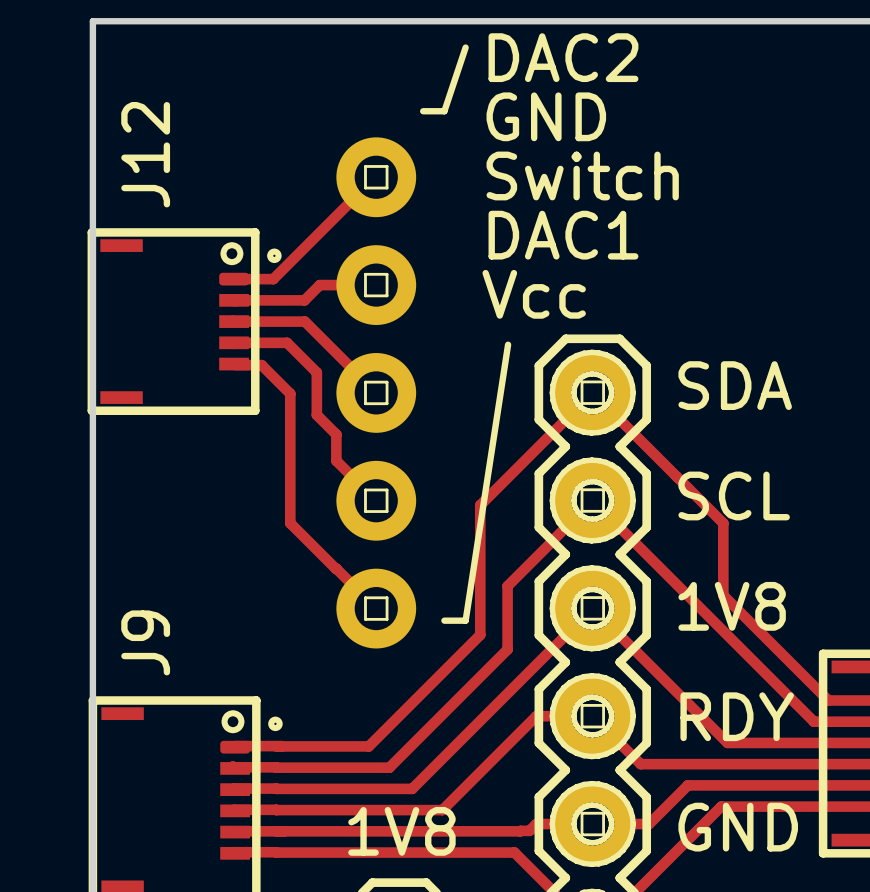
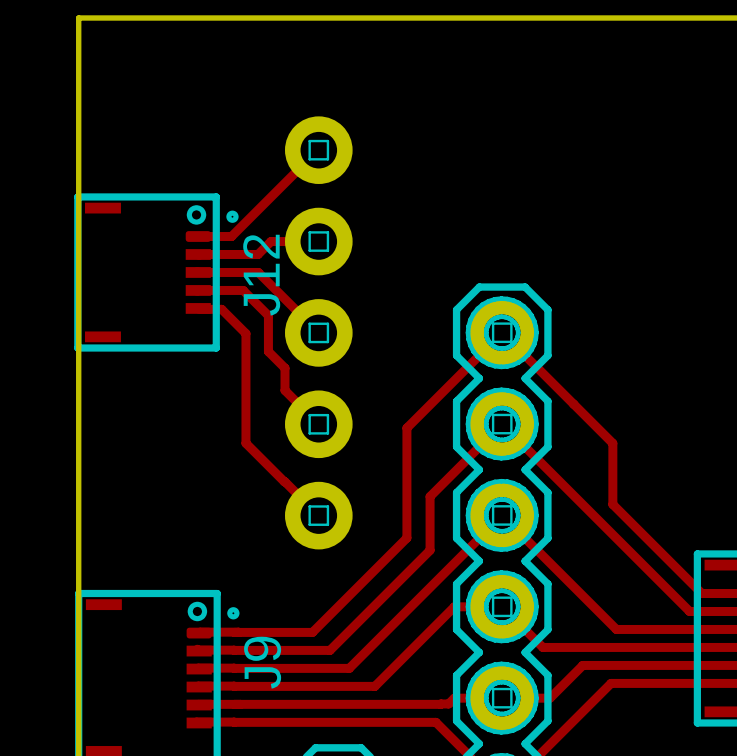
line: (465, 47) (444, 111) (423, 111) -> none
text: DAC2 (563, 57) -> none
text: GND (546, 116) -> none
J12 name position: J12 (145, 154) -> J12 (261, 275)
text: Switch (582, 175) -> none
text: DAC1 (563, 235) -> none
text: Vcc (534, 294) -> none
line: (508, 344) (465, 620) (444, 620) -> none
text: SDA (735, 385) -> none
text: SCL (734, 495) -> none
text: 1V8 (732, 606) -> none
J9 name position: J9 (145, 642) -> J9 (262, 662)
text: RDY (737, 716) -> none
text: GND (738, 827) -> none
text: 1V8 (401, 831) -> none

